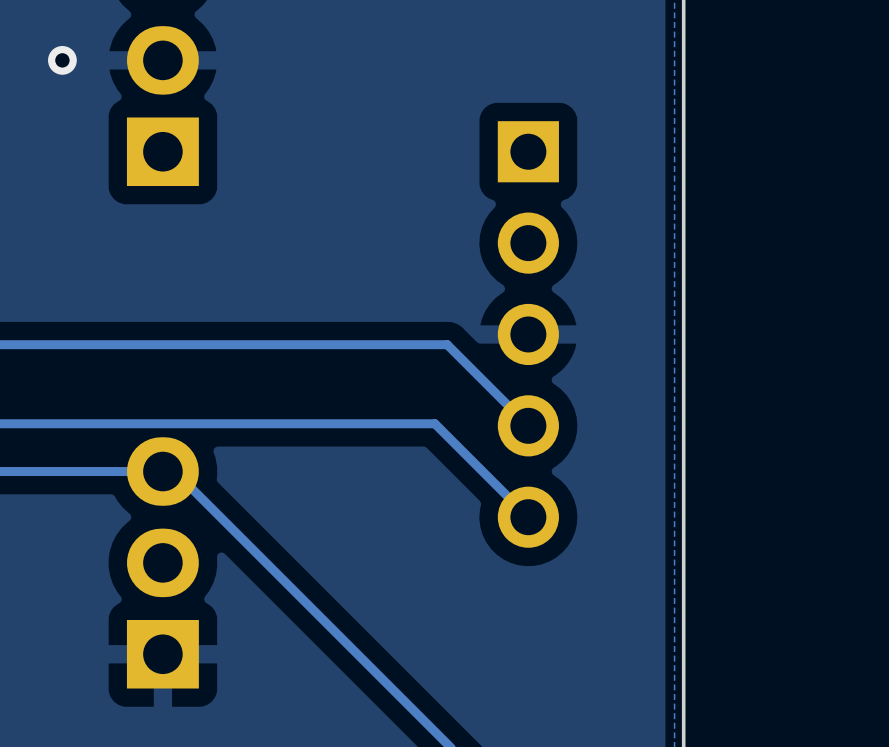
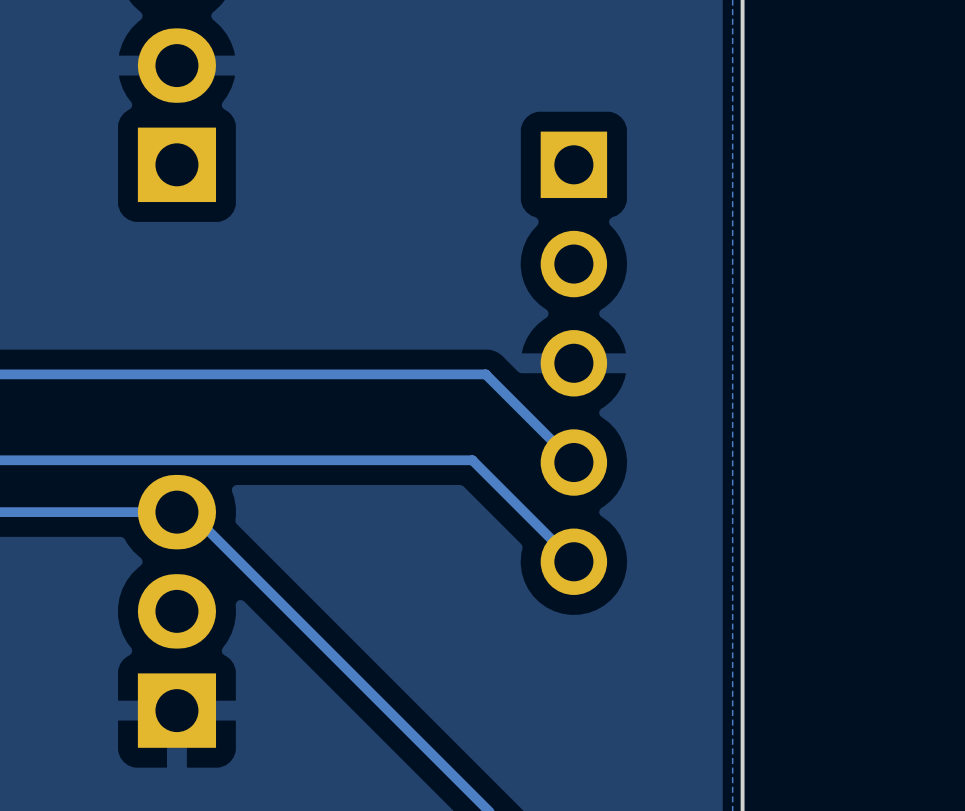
via: (62, 60) -> none

